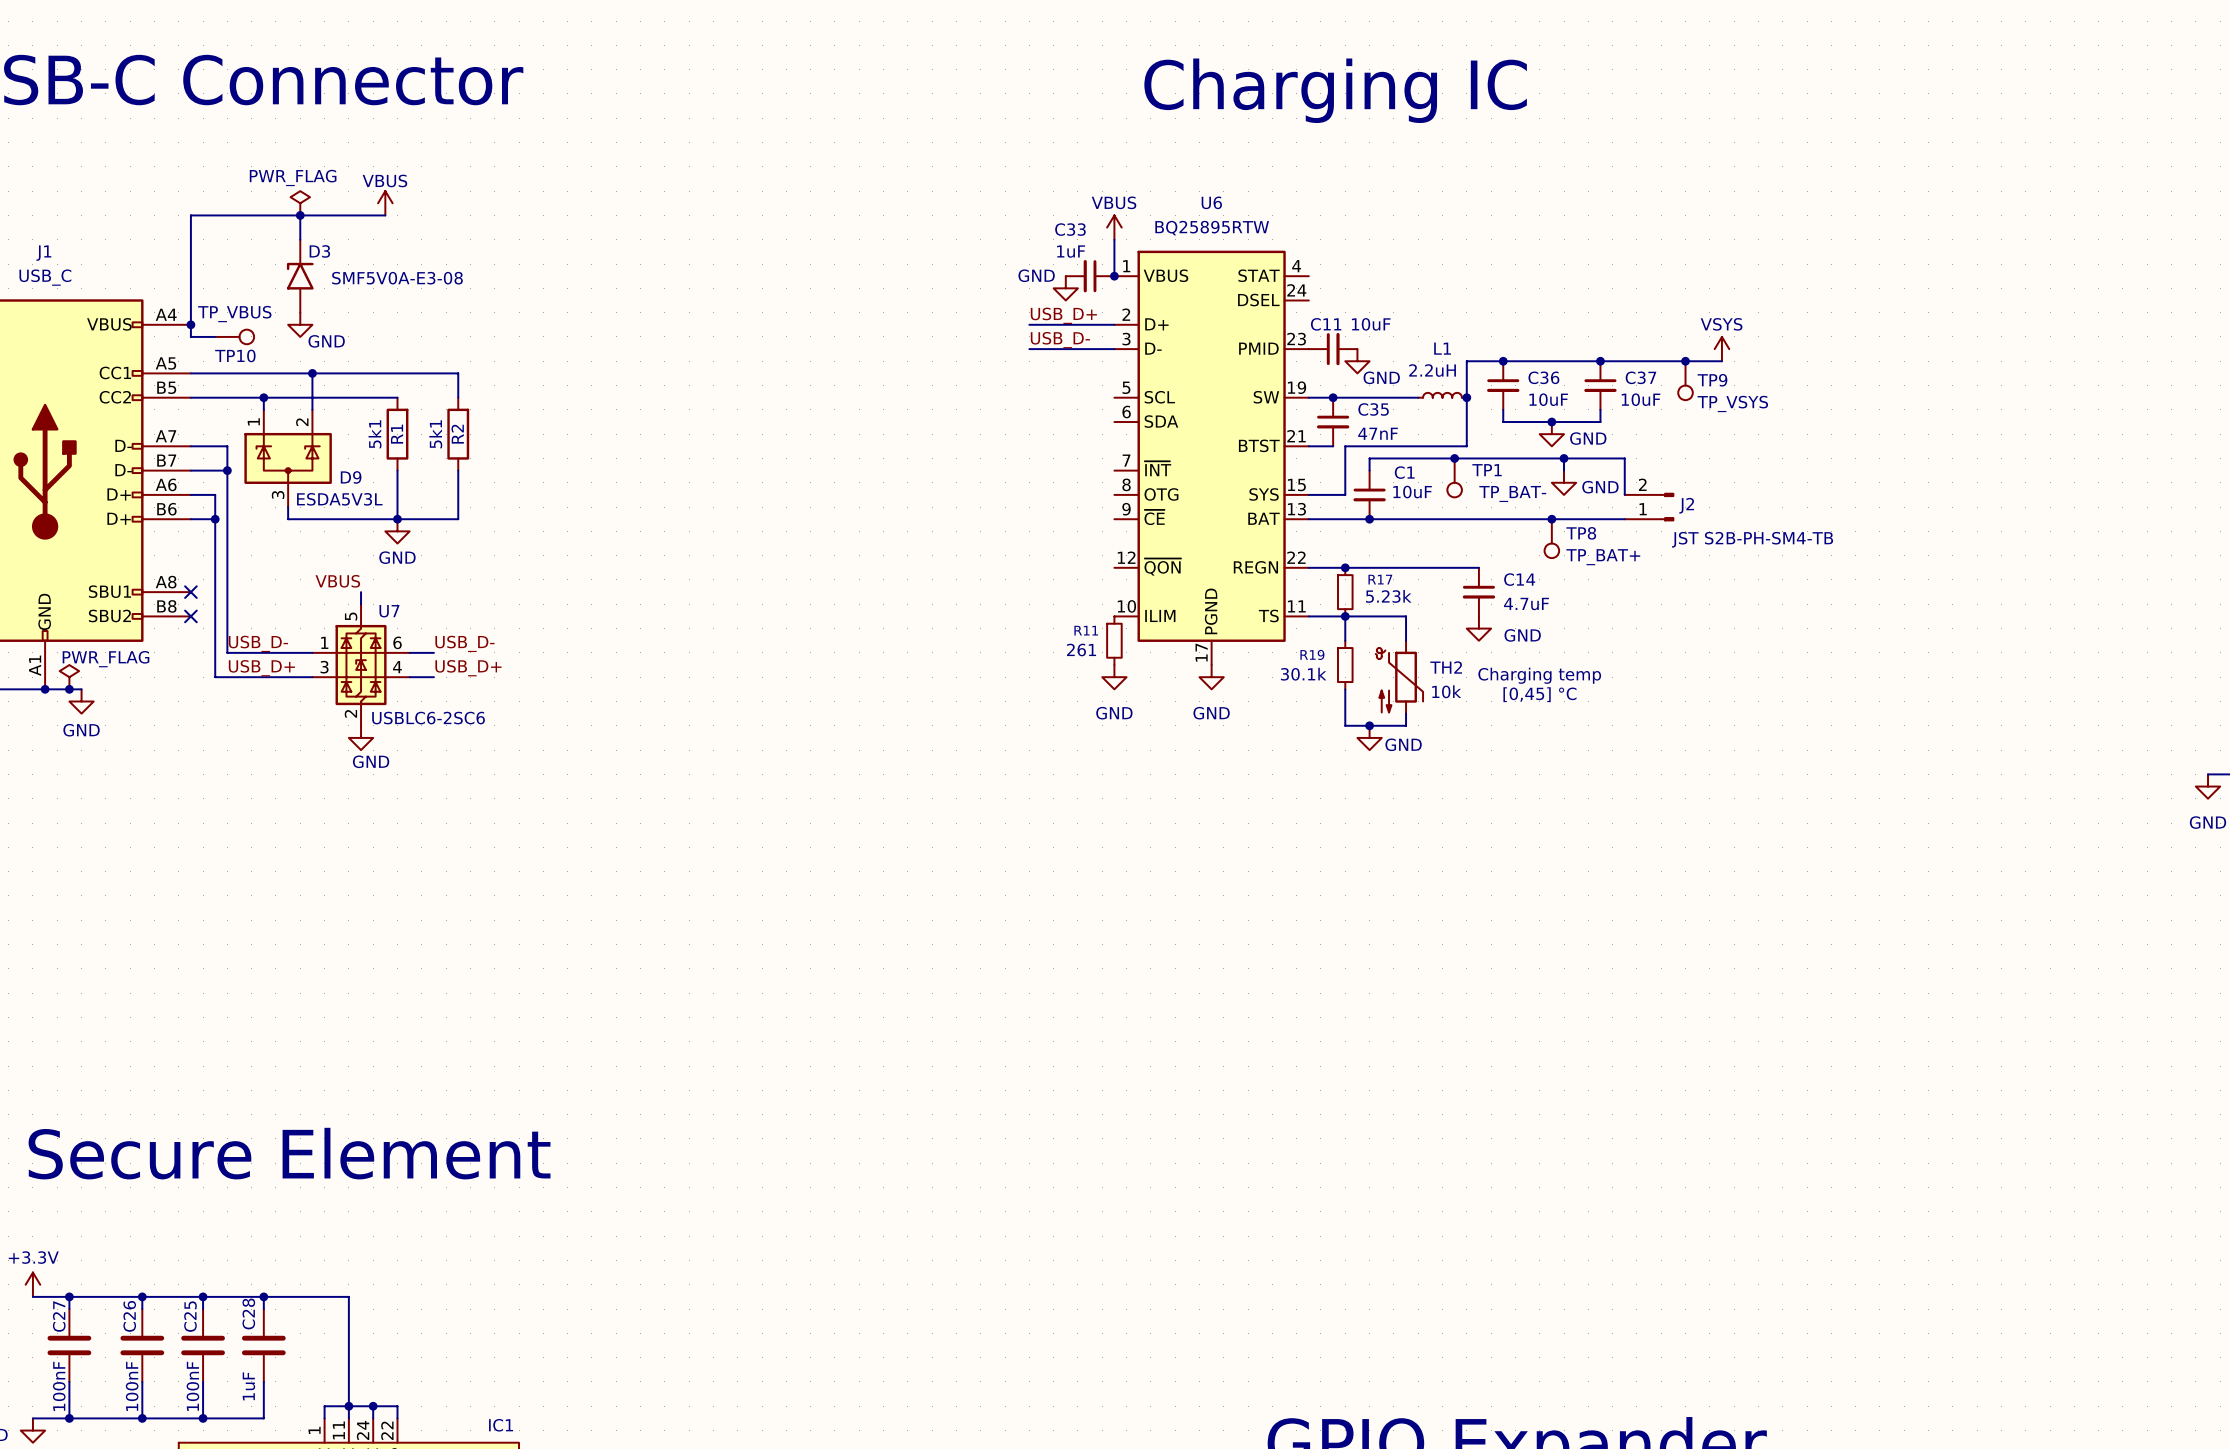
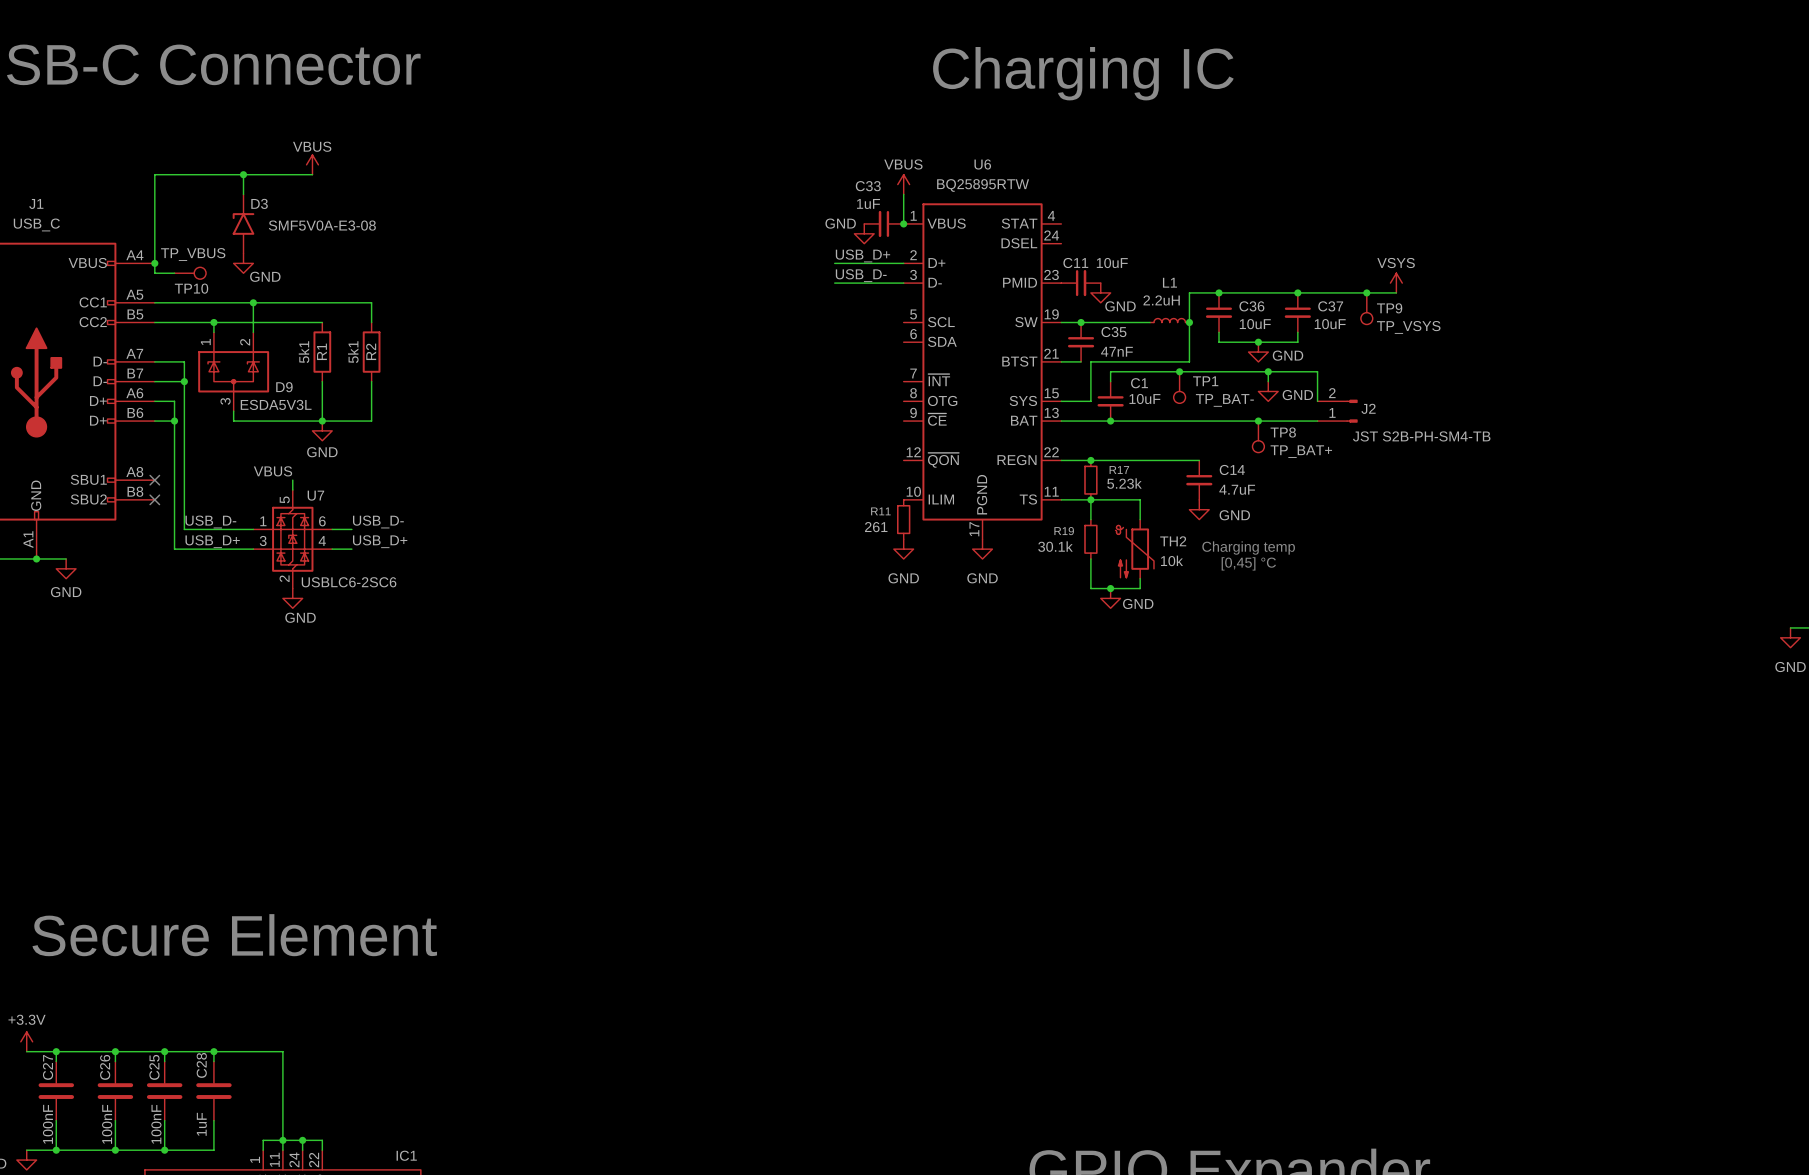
power symbol: PWR_FLAG (300, 203) -> none
power symbol: PWR_FLAG (69, 677) -> none
junction: (69, 689) -> none

